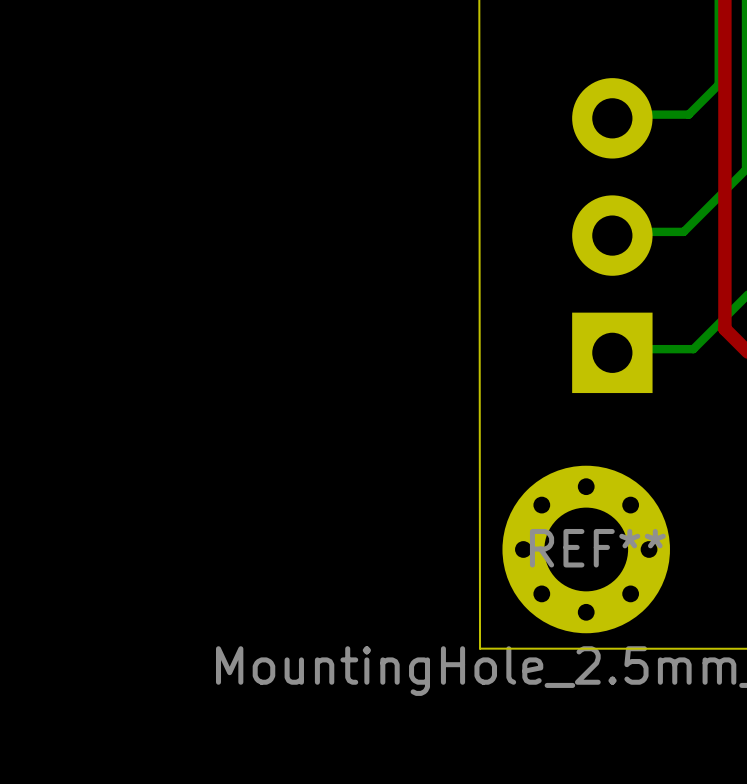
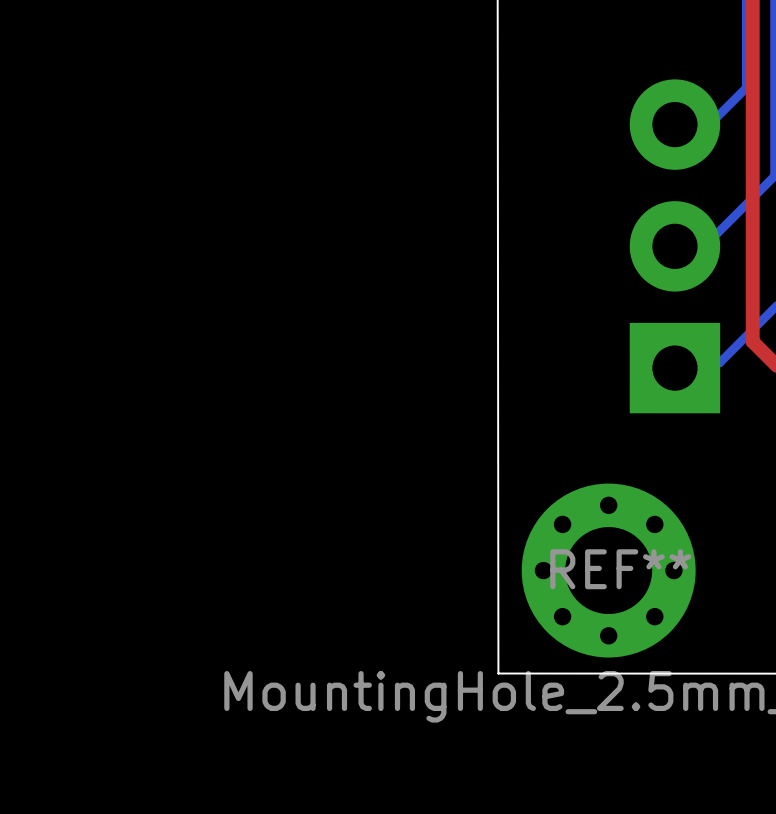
part: (612, 235) -> none
part: none -> (674, 246)

